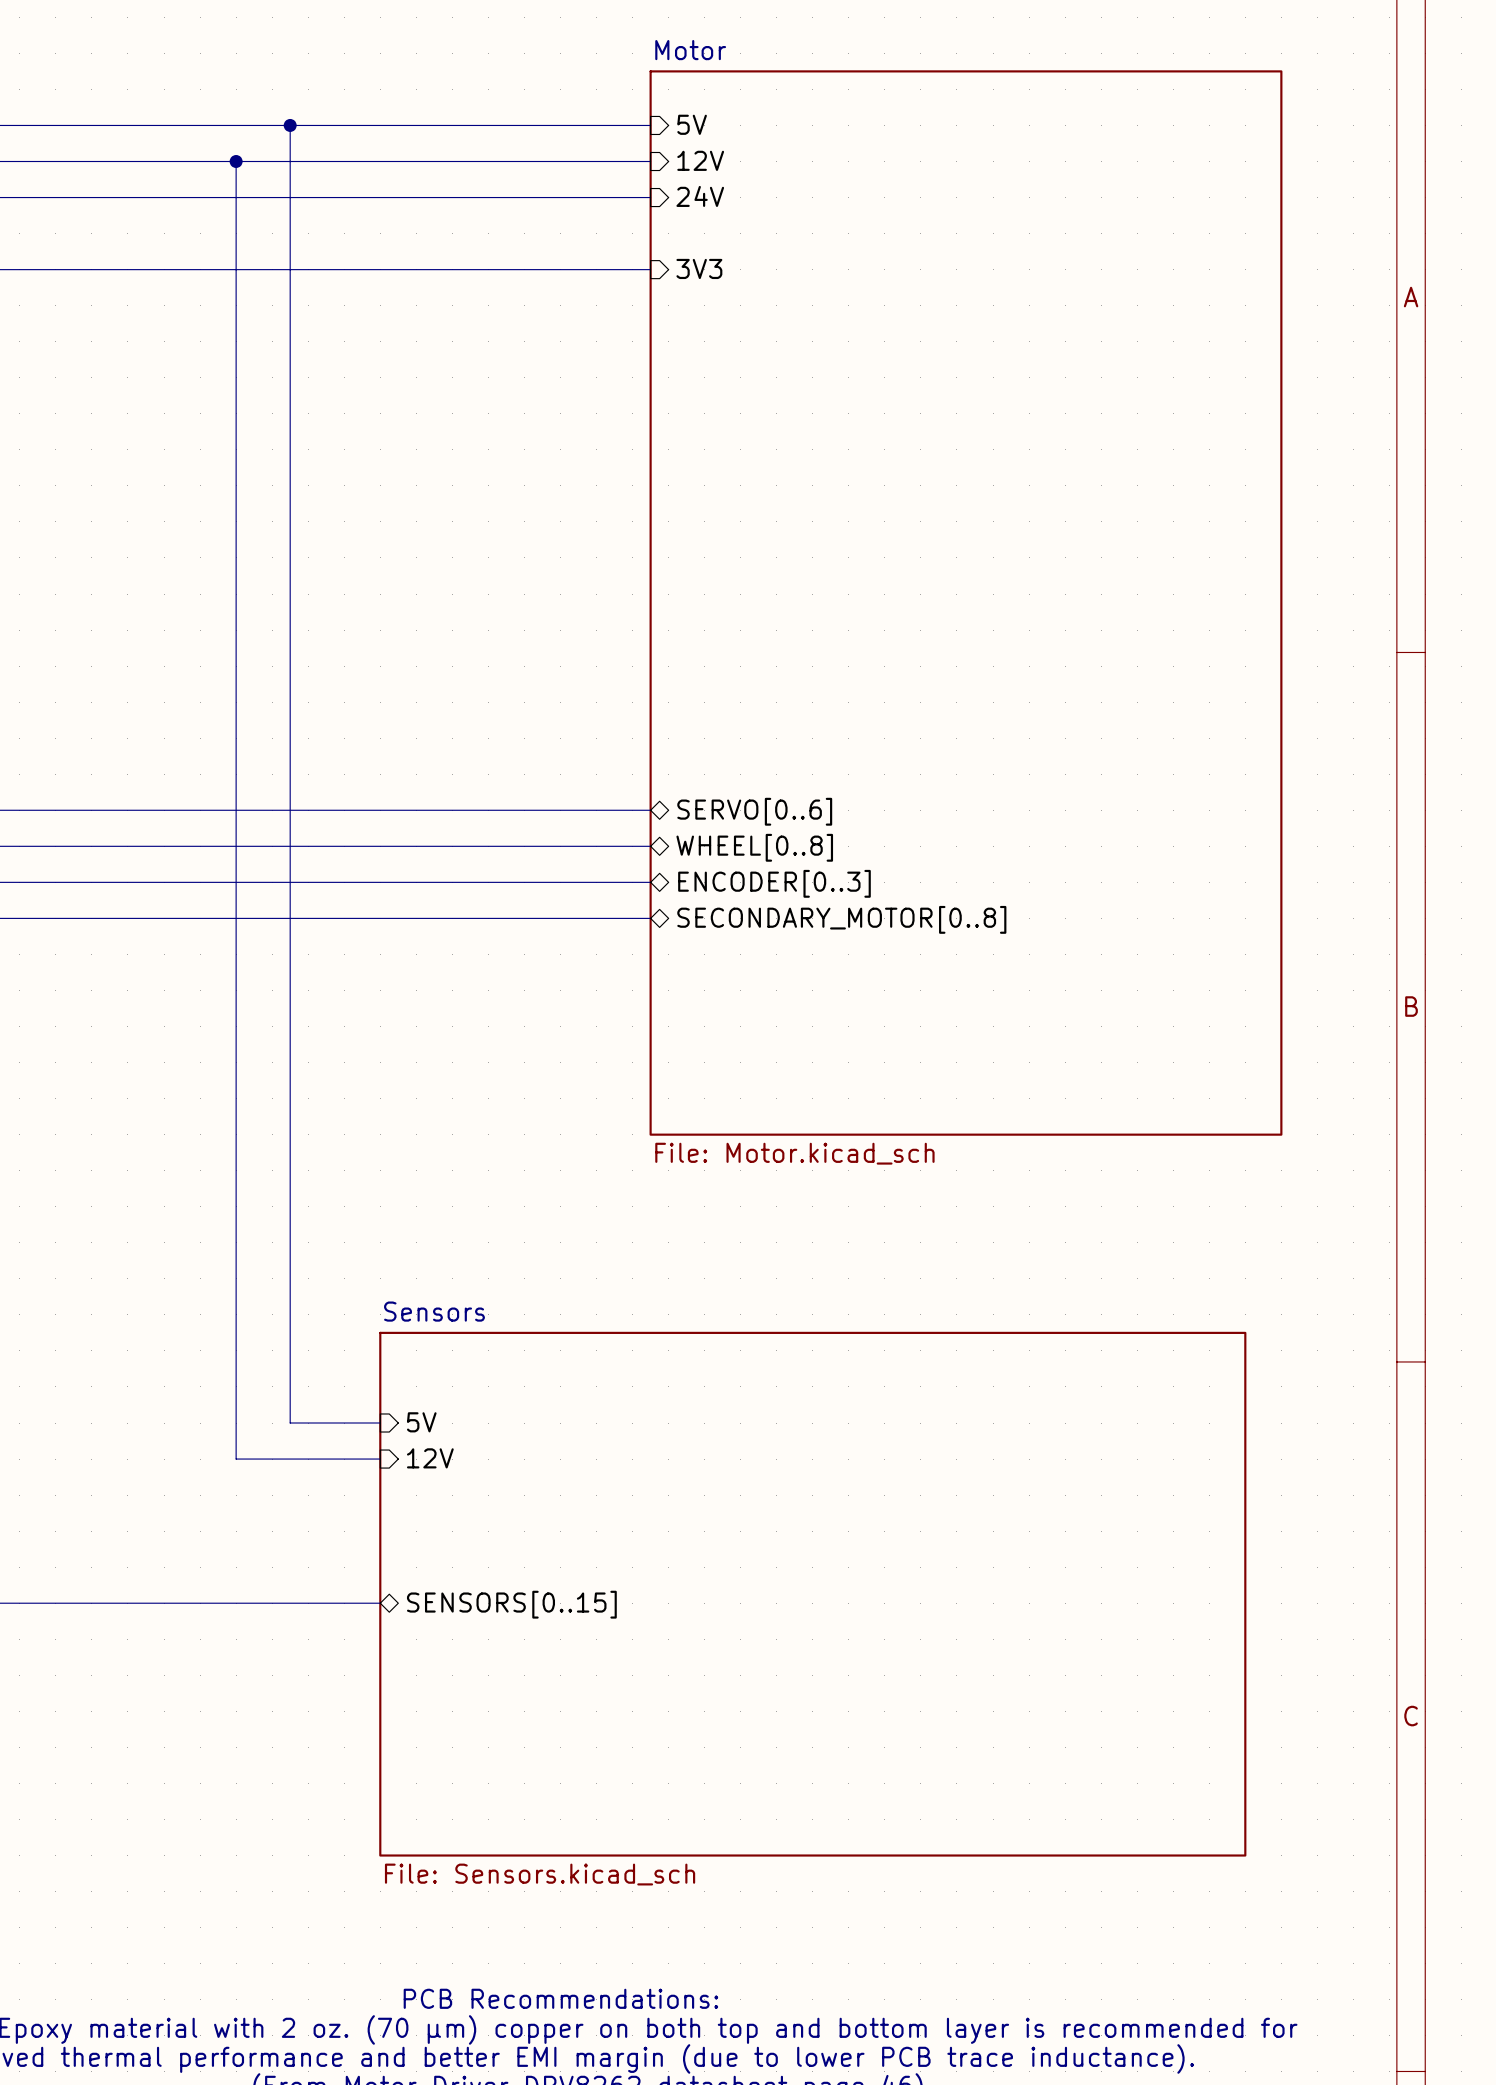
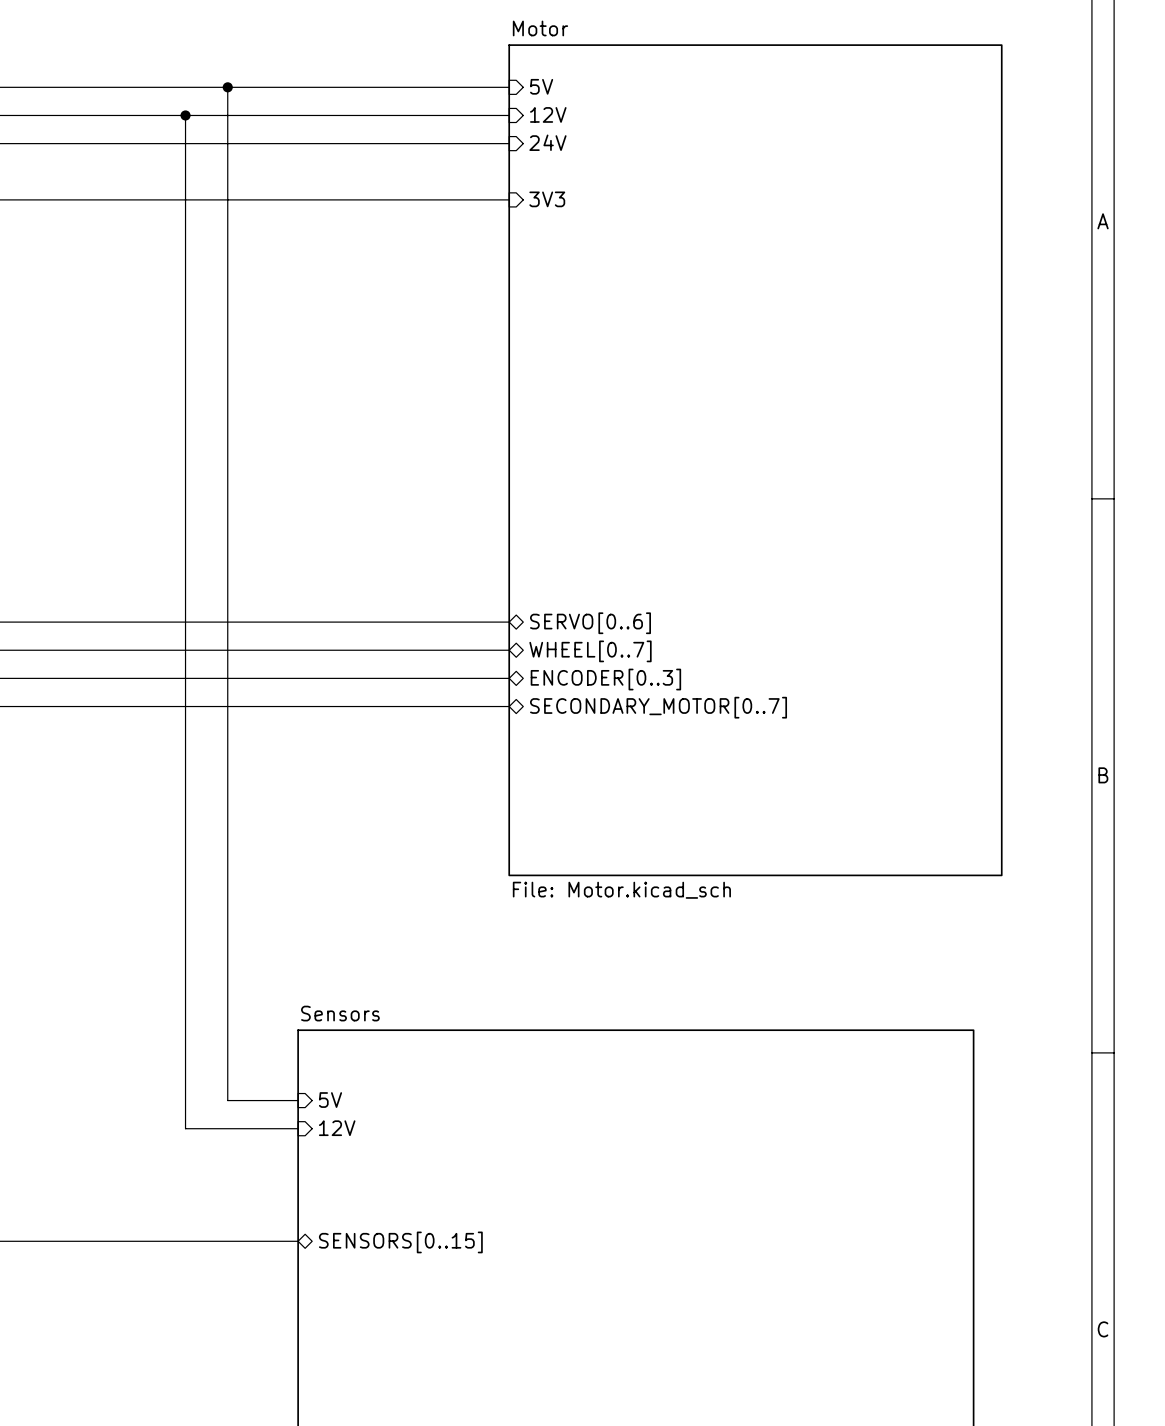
sheet pin: WHEEL[0..8] (754, 847) -> WHEEL[0..7] (590, 651)
sheet pin: SECONDARY_MOTOR[0..8] (841, 919) -> SECONDARY_MOTOR[0..7] (658, 707)

